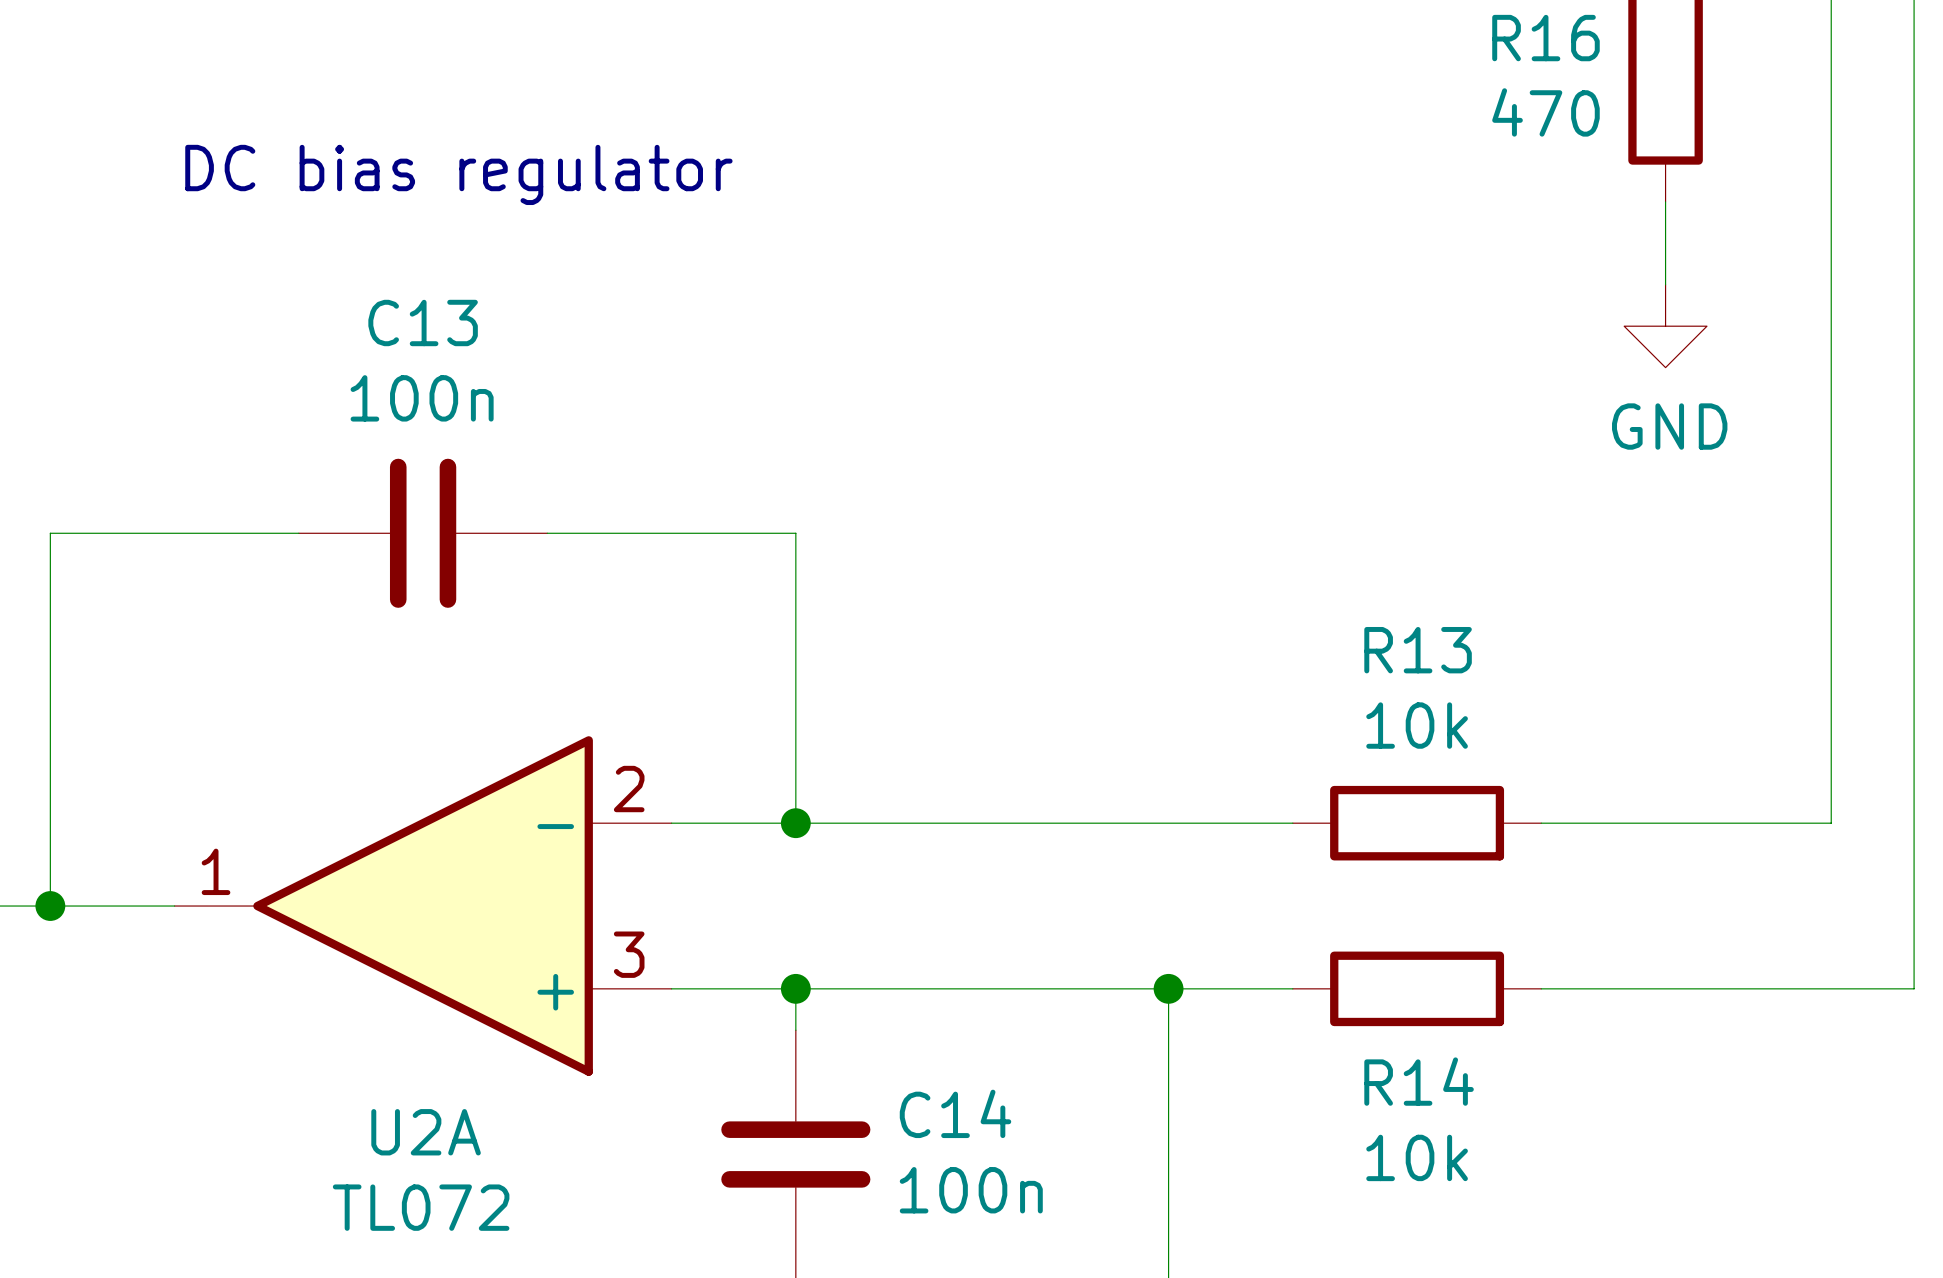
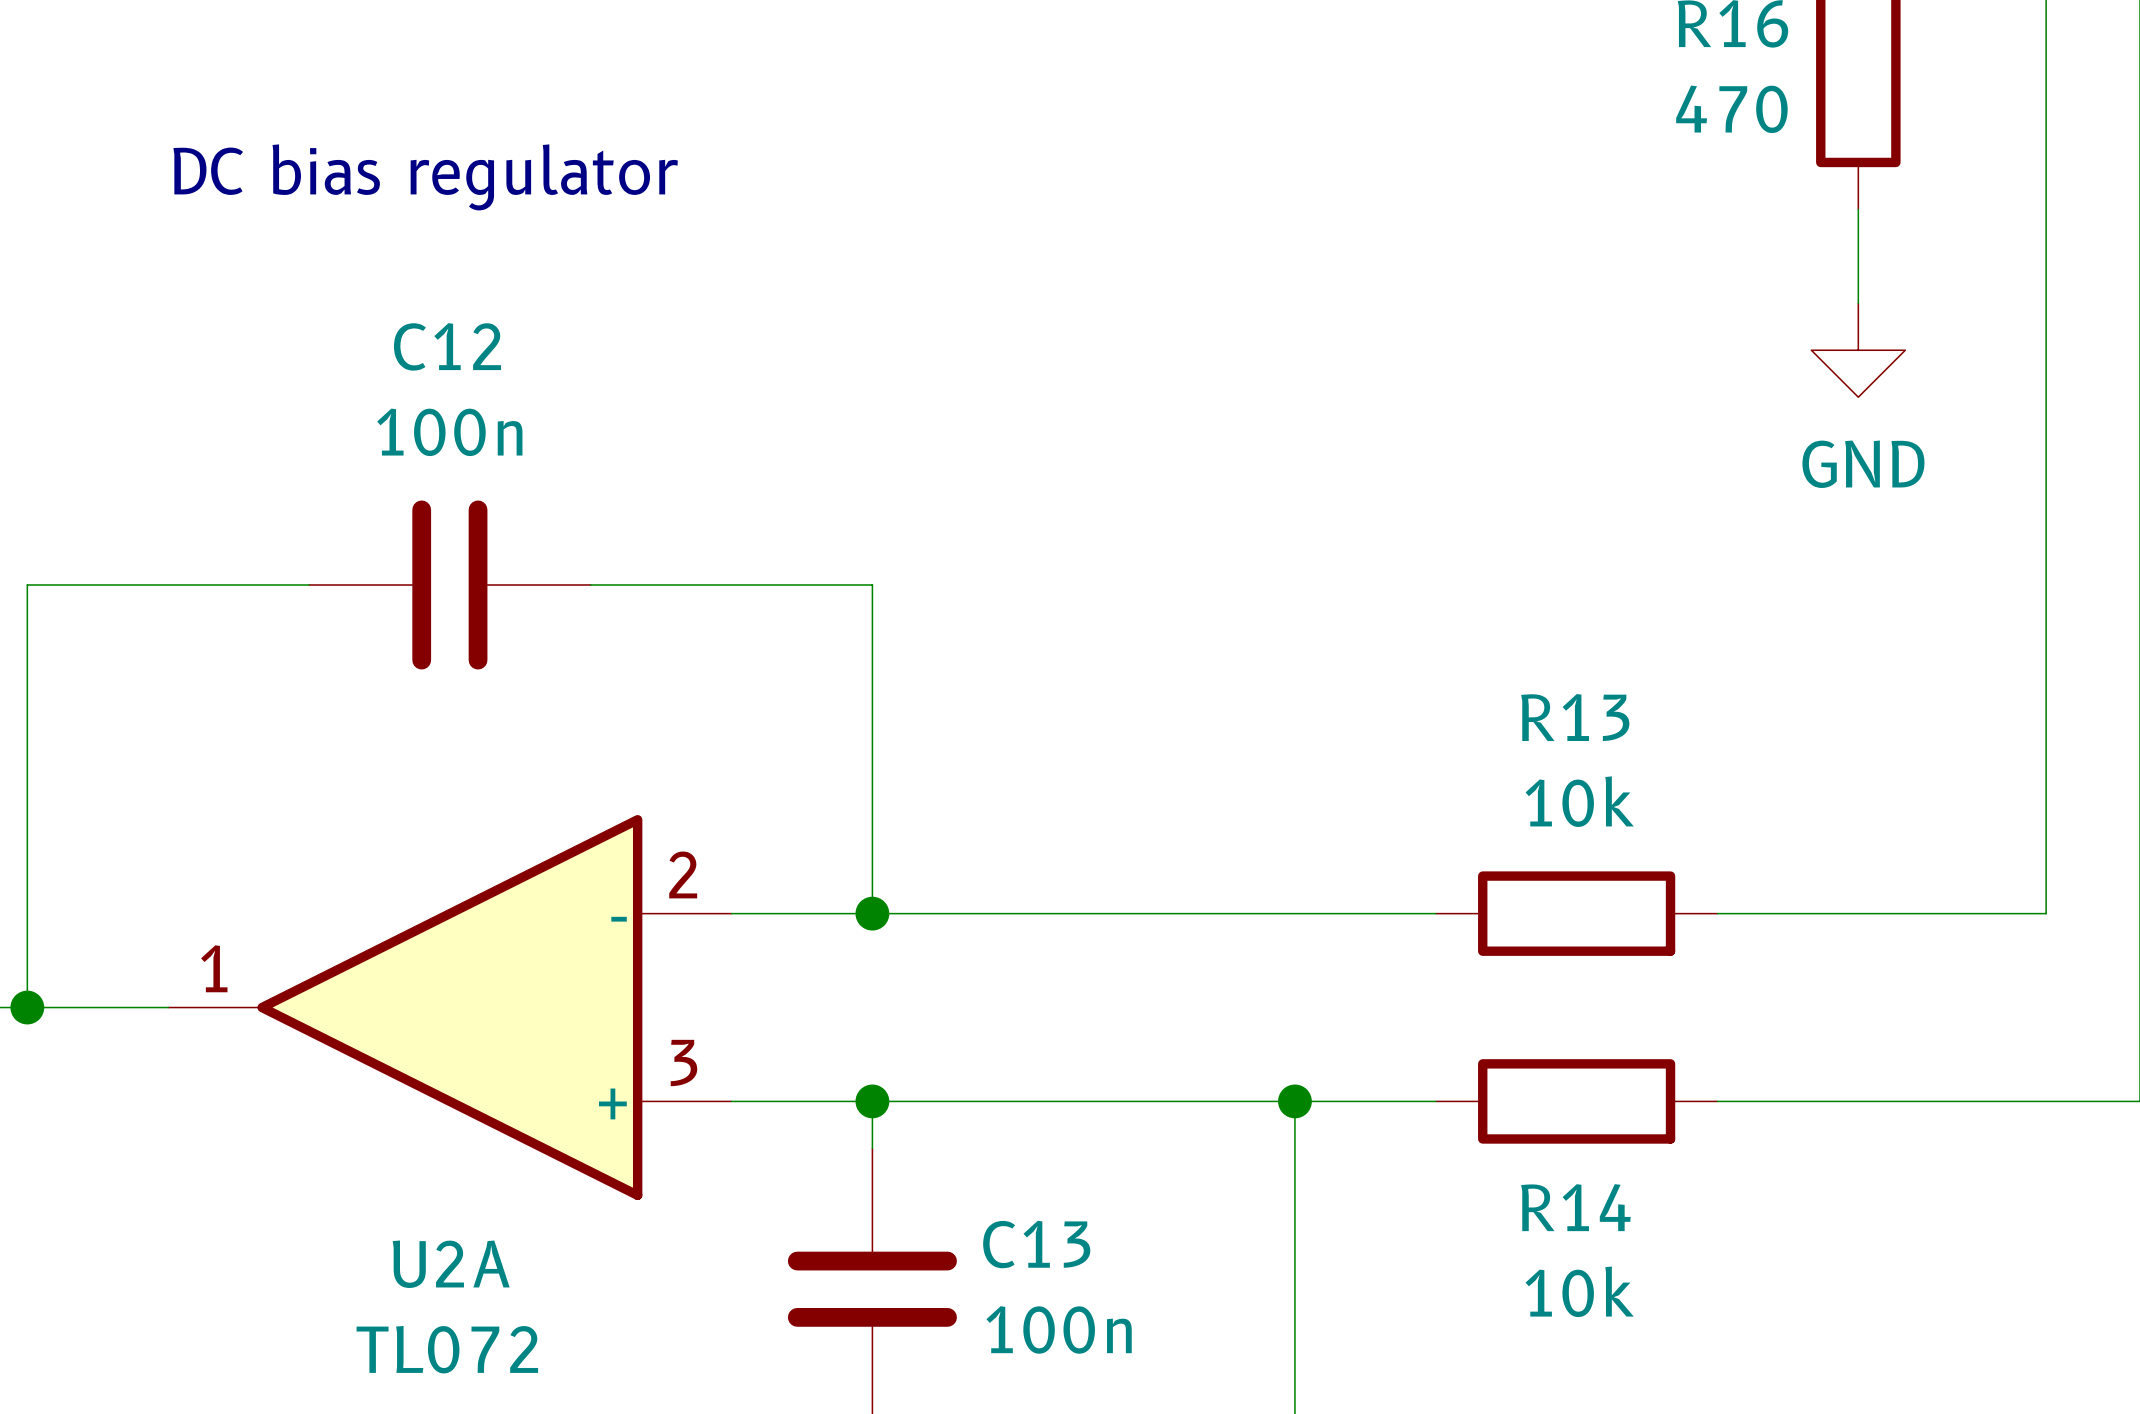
C13 name: C13 (423, 322) -> C12 (447, 346)
C14 name: C14 (955, 1113) -> C13 (1036, 1244)

